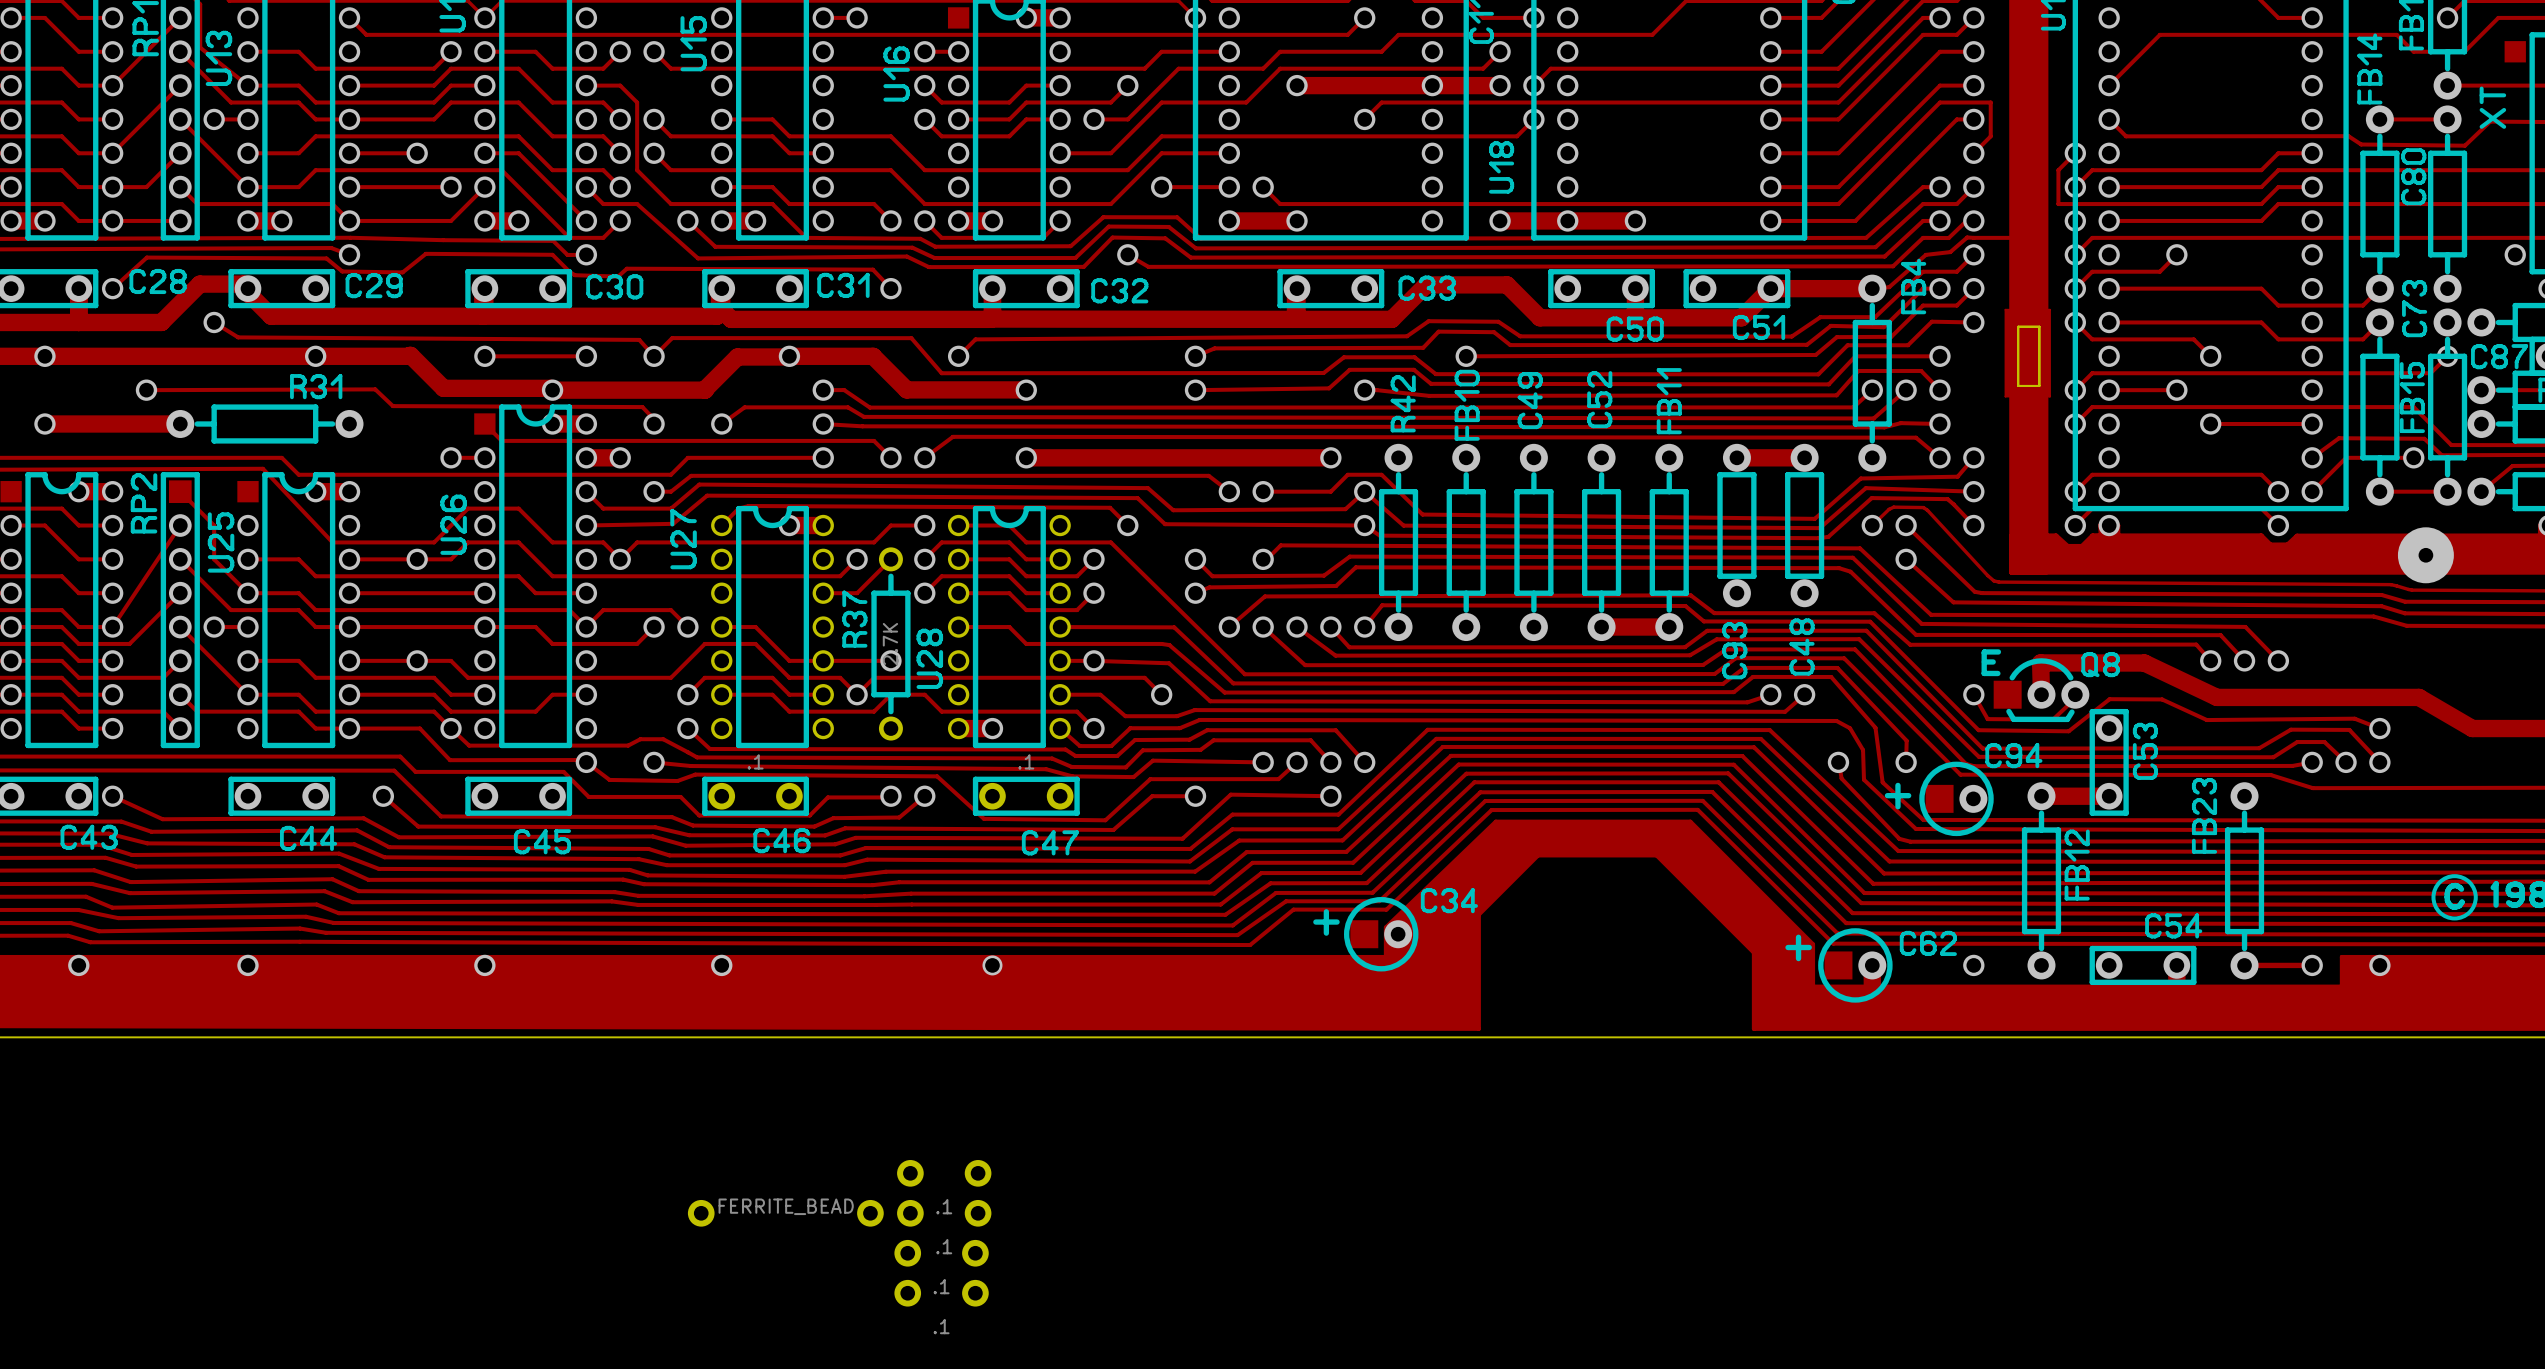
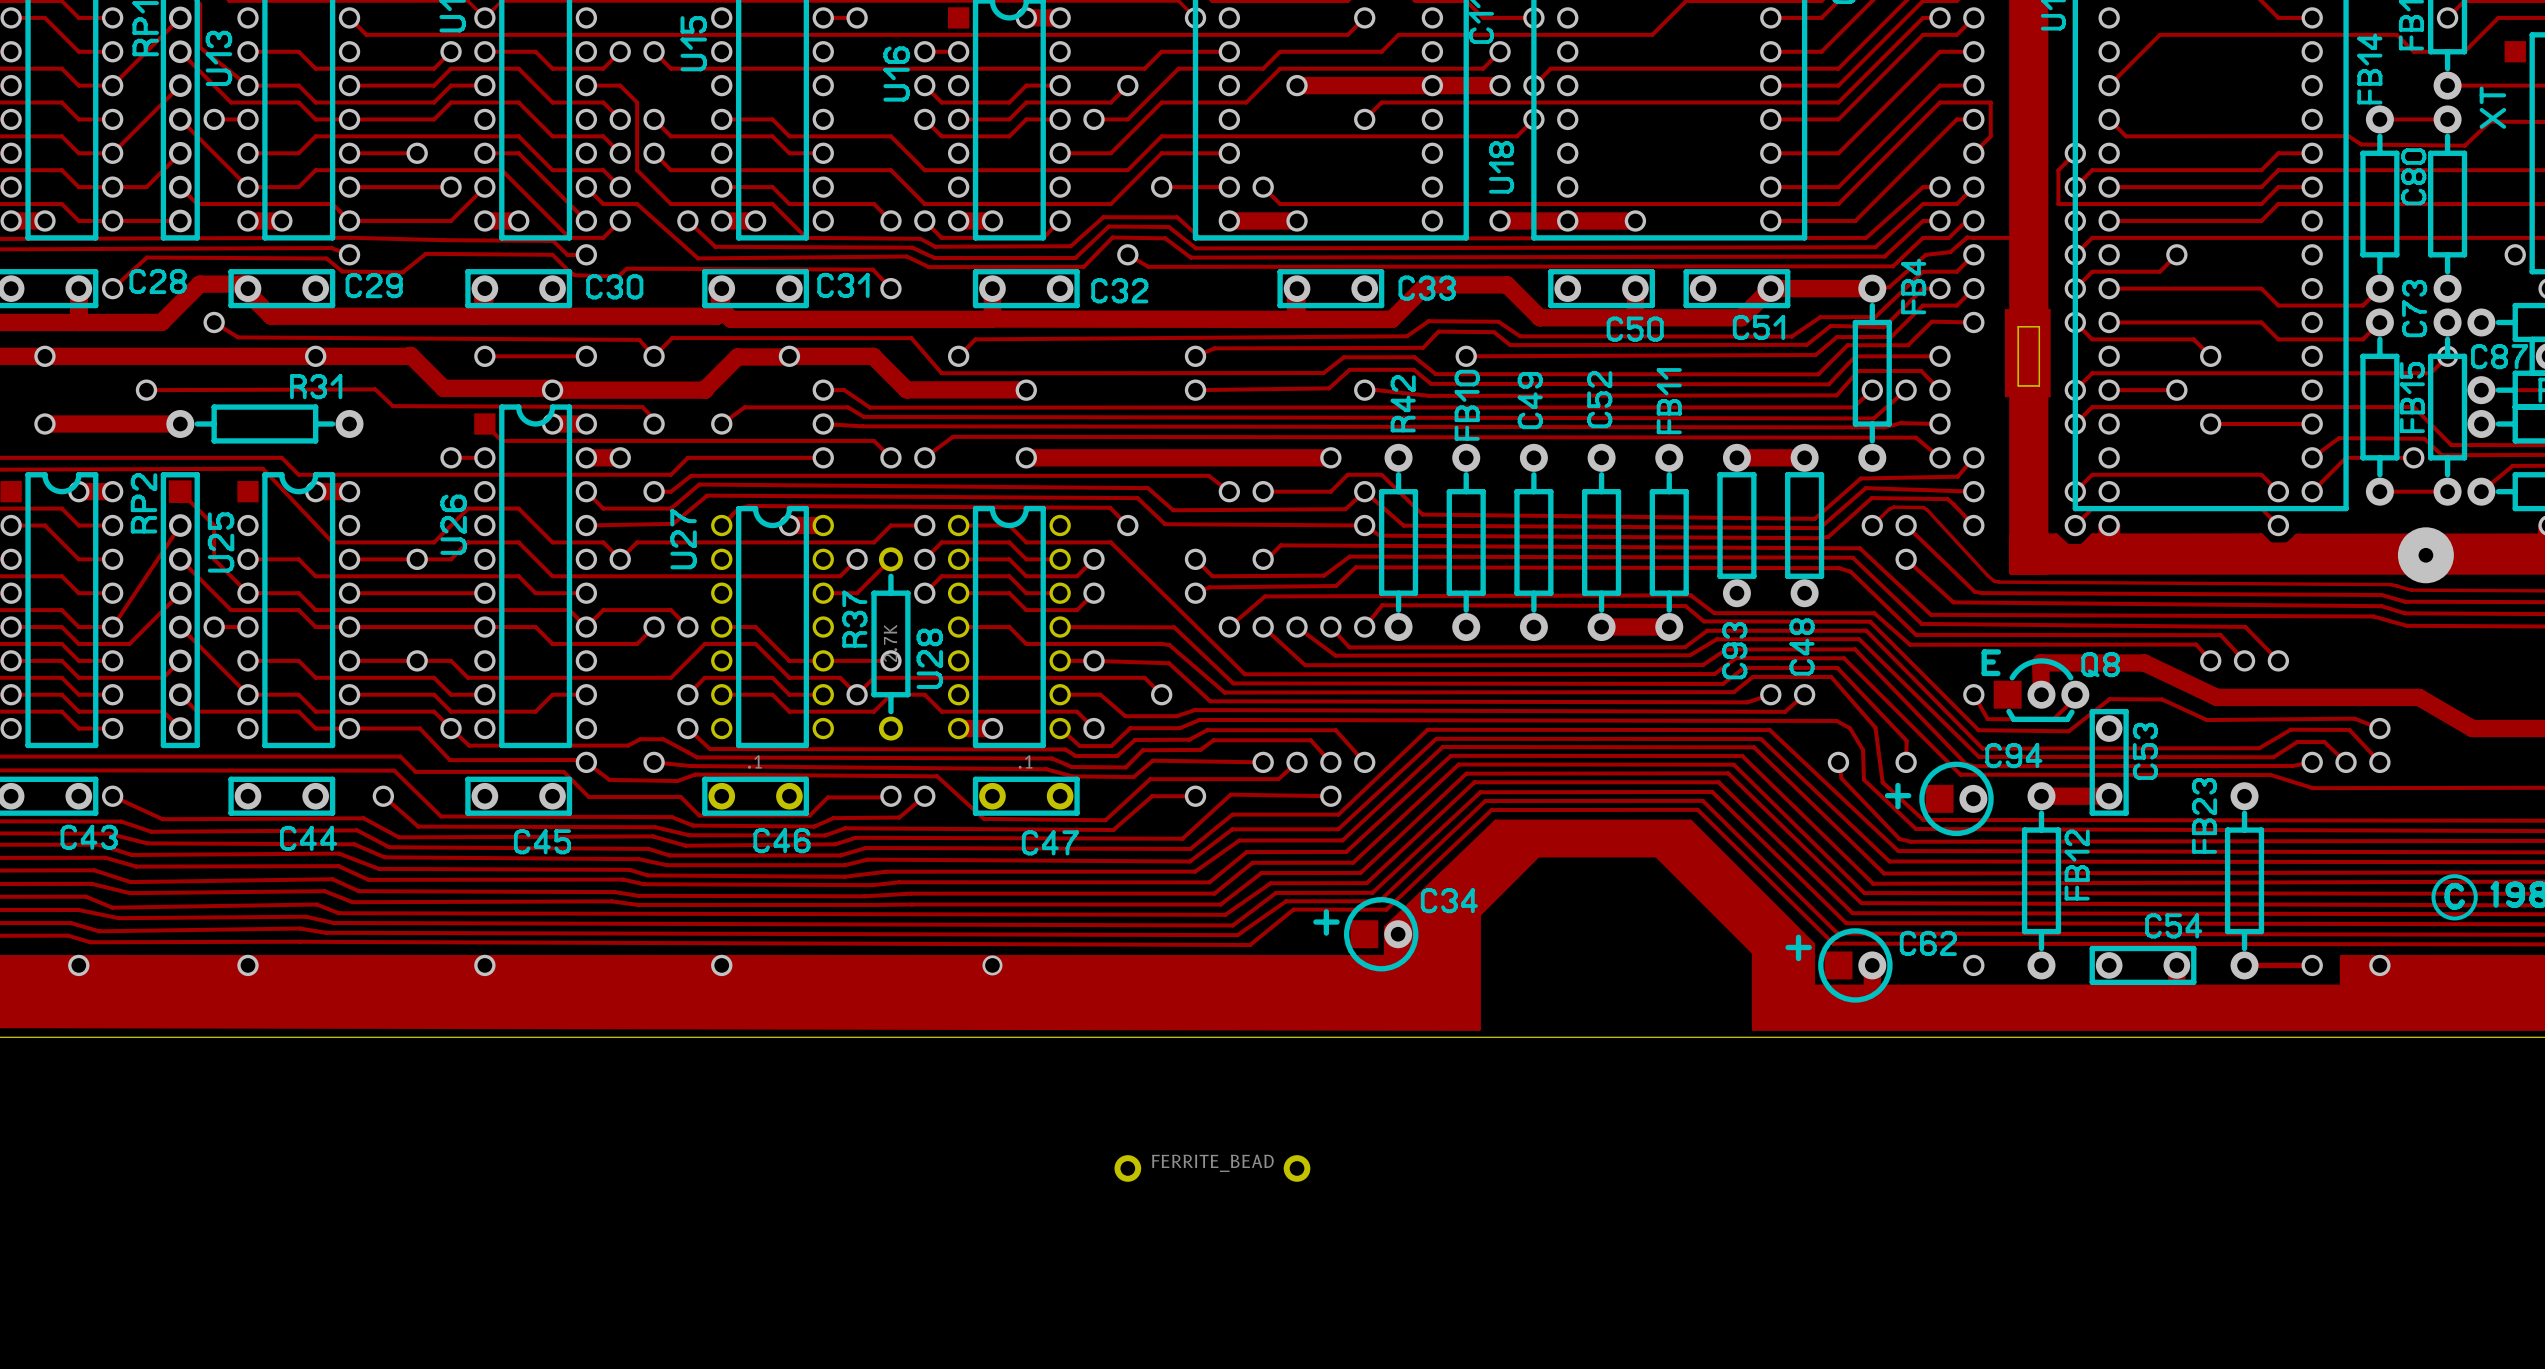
part: none -> FERRITE_BEAD (1212, 1168)
part: .1 (944, 1173) -> none
part: FERRITE_BEAD (785, 1213) -> none
part: .1 (944, 1213) -> none
part: .1 (941, 1253) -> none
part: .1 (941, 1293) -> none

